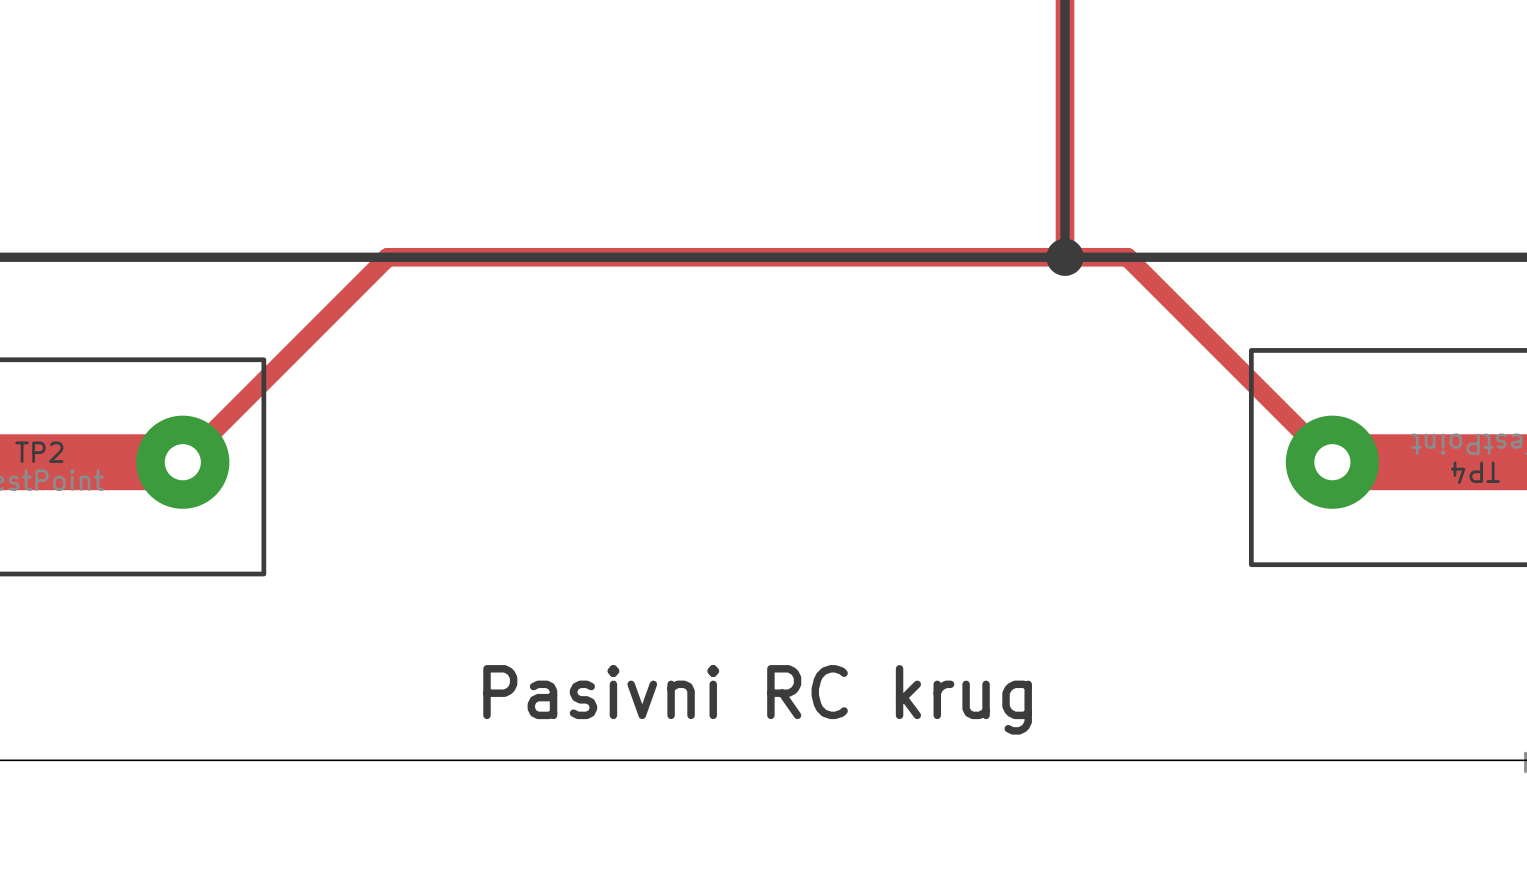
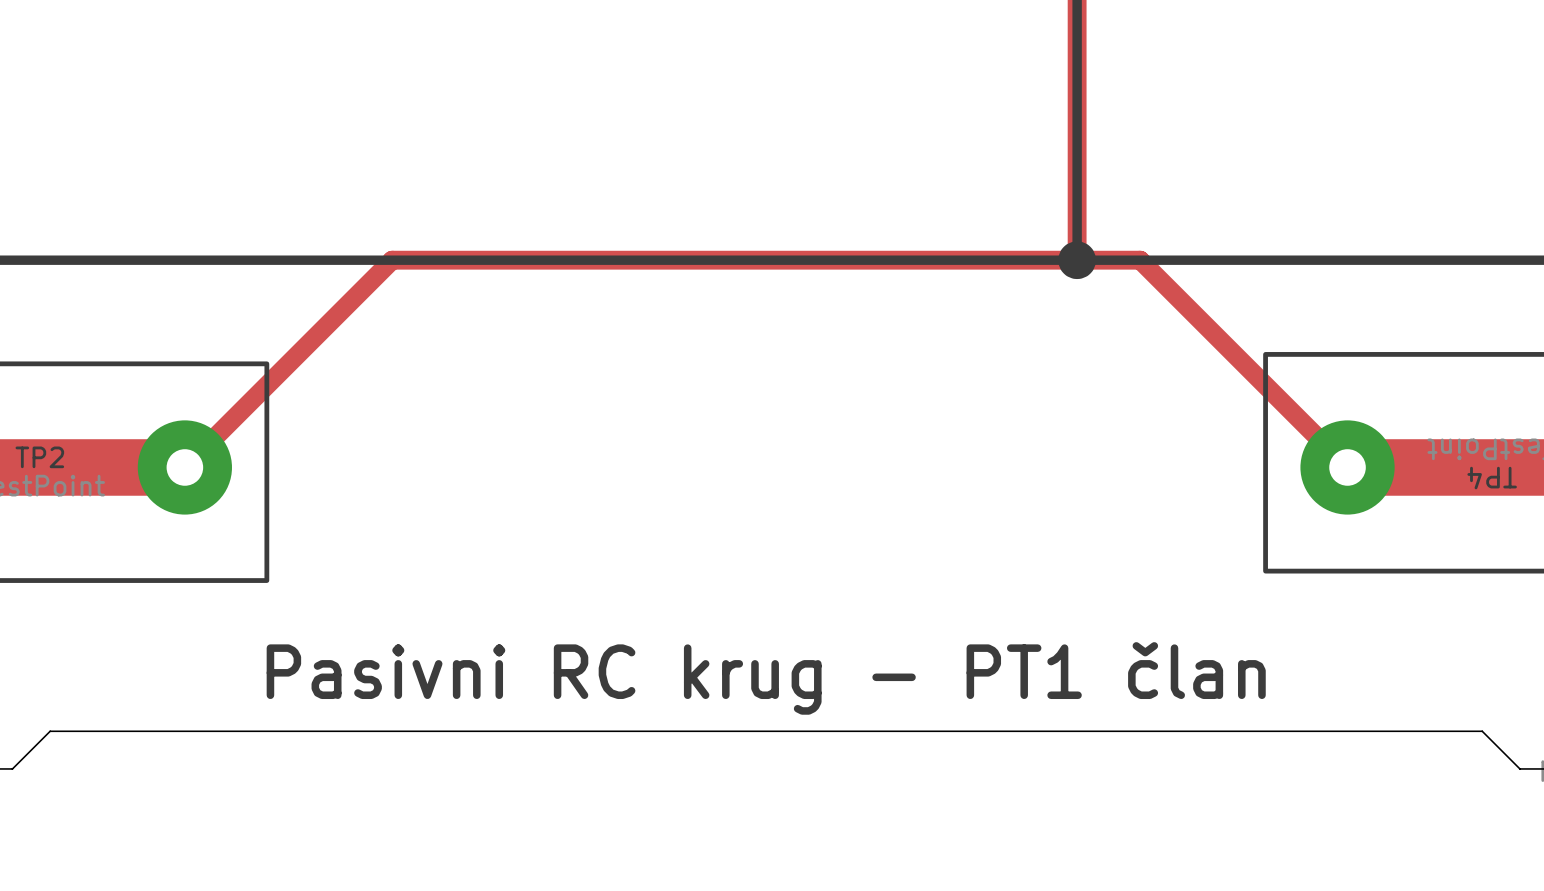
text: Pasivni RC krug (757, 699) -> Pasivni RC krug - PT1 član (766, 678)
board edge: (12, 760) (1502, 760) -> (12, 768) (50, 731) (1482, 731) (1519, 768)

